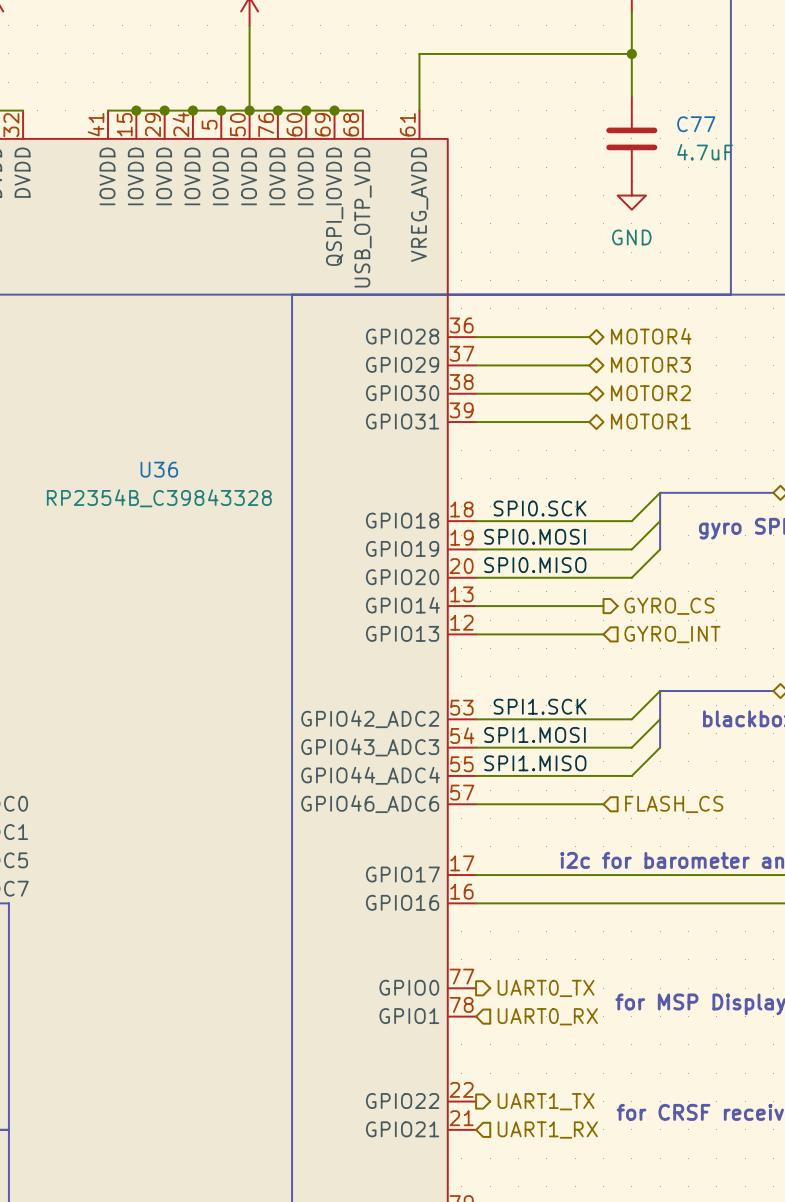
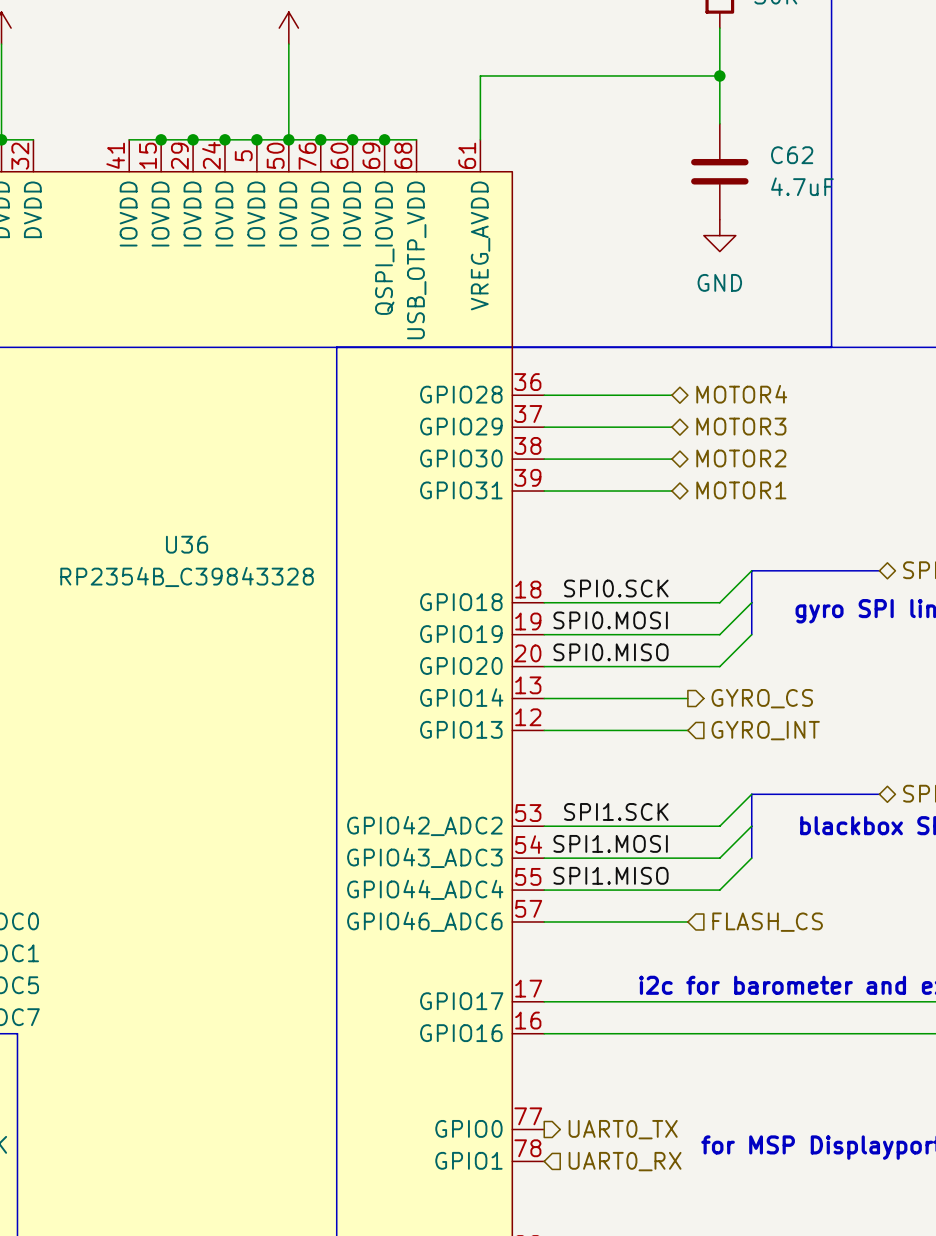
C77 name: C77 (696, 124) -> C62 (792, 155)

